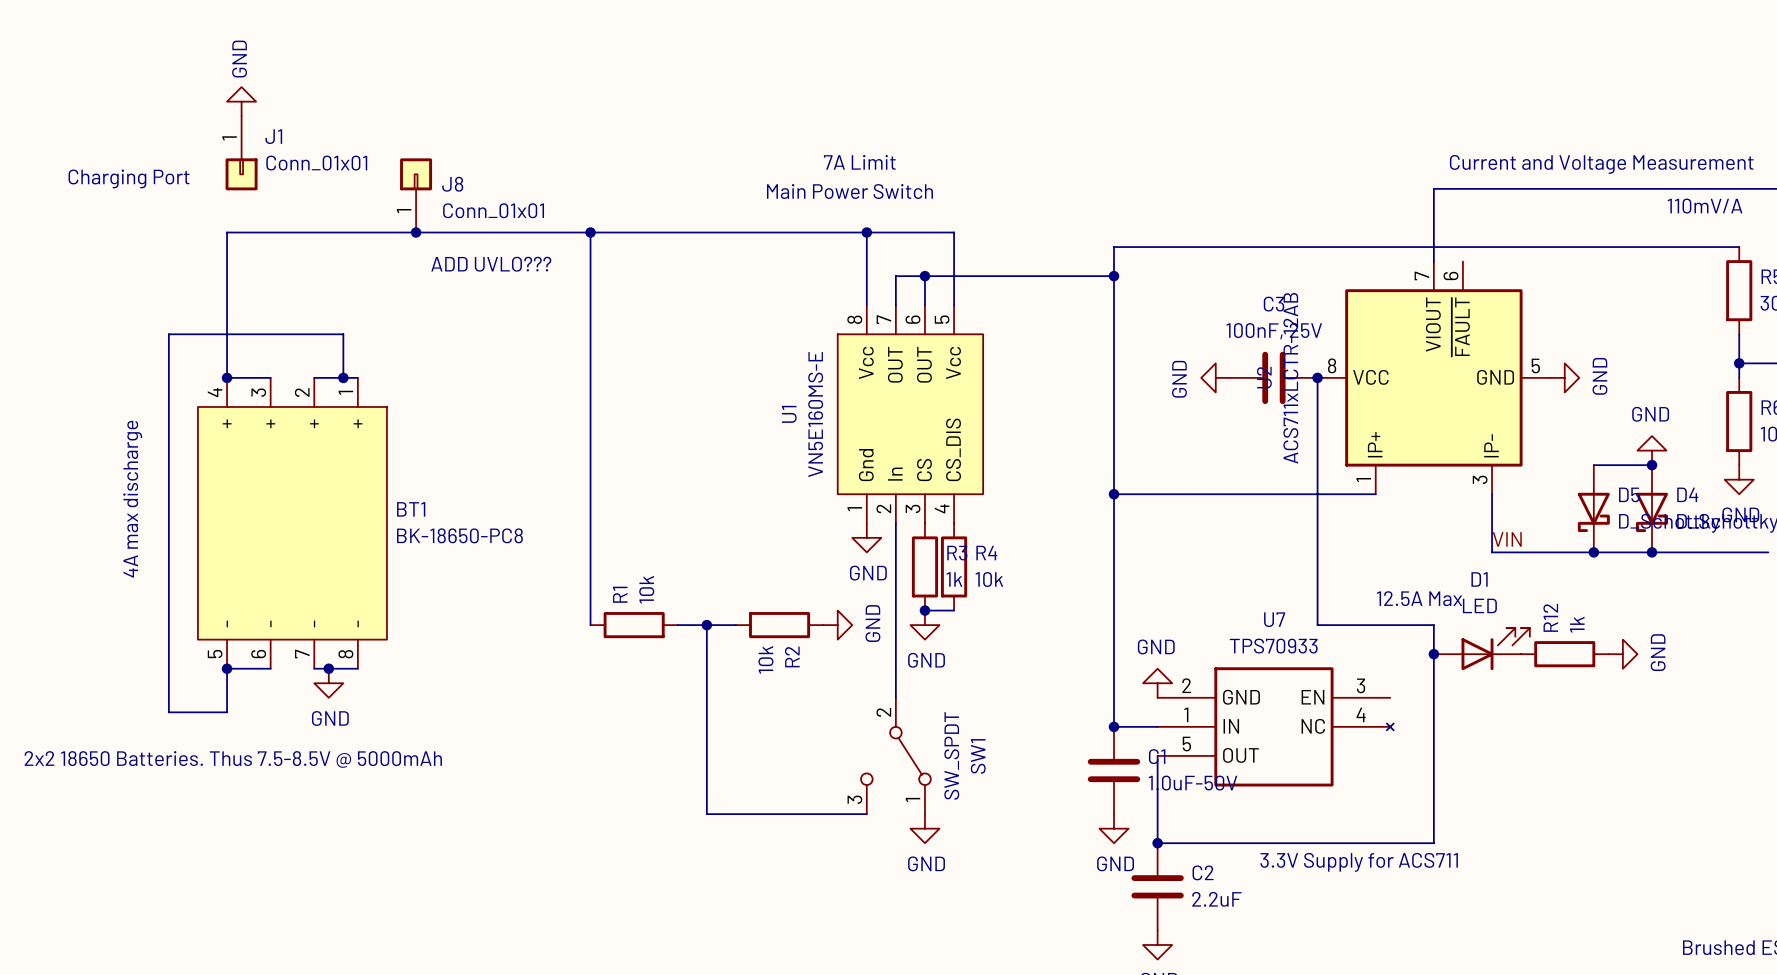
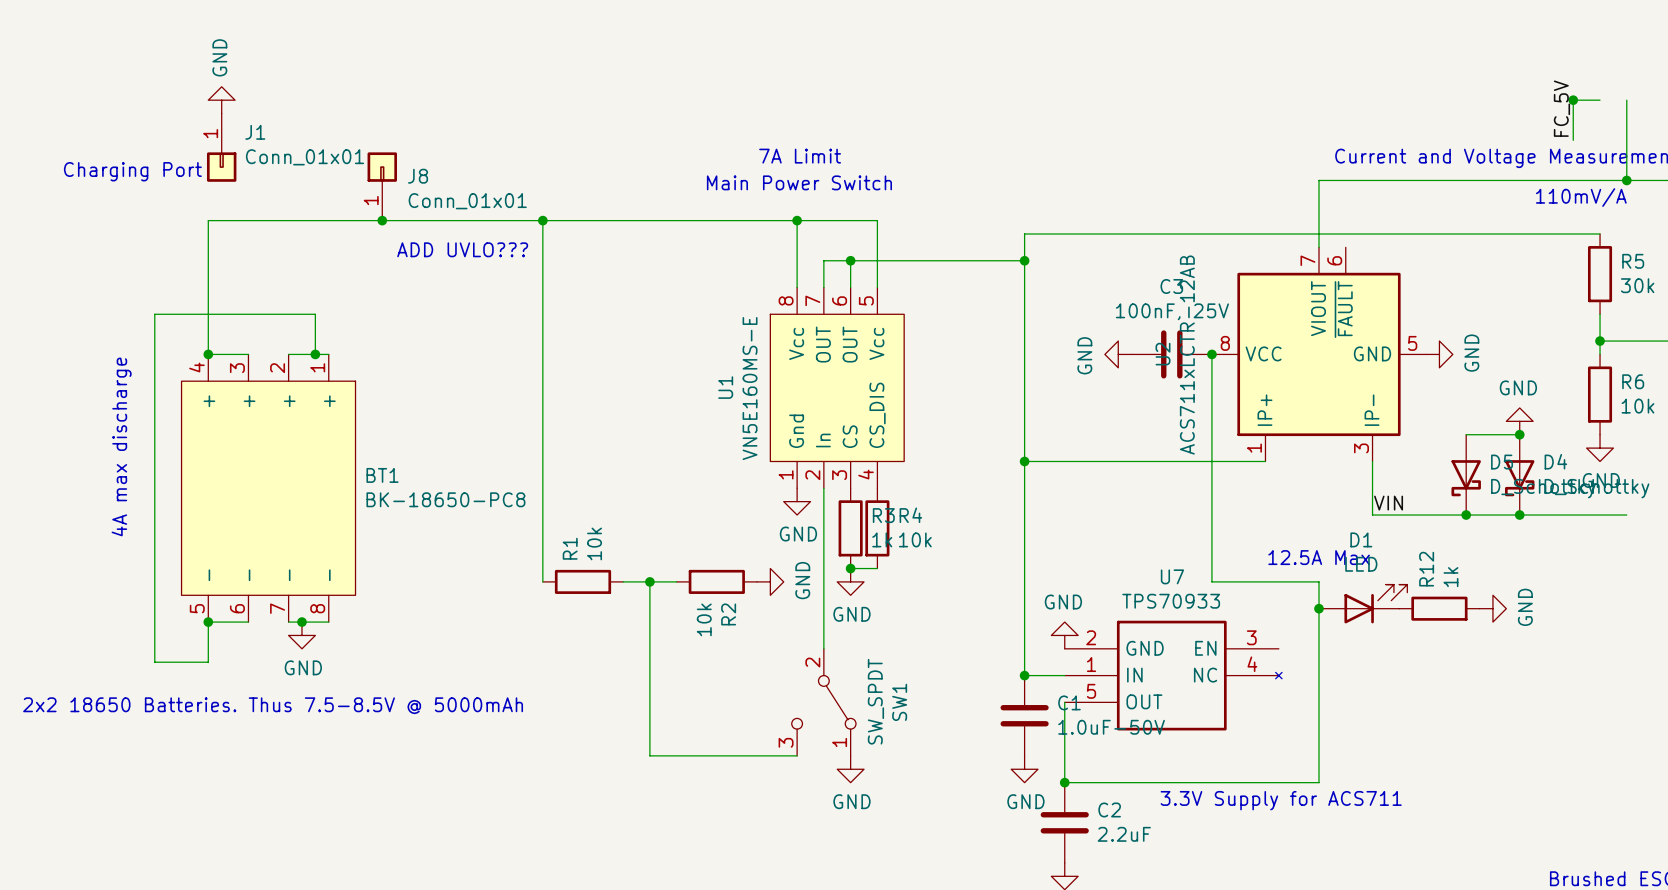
junction: none -> (1573, 100)
wire: none -> (1600, 100) (1573, 100) (1573, 140)
wire: none -> (1626, 100) (1626, 180)
label: none -> FC_5V (1561, 108)
junction: none -> (1626, 180)

